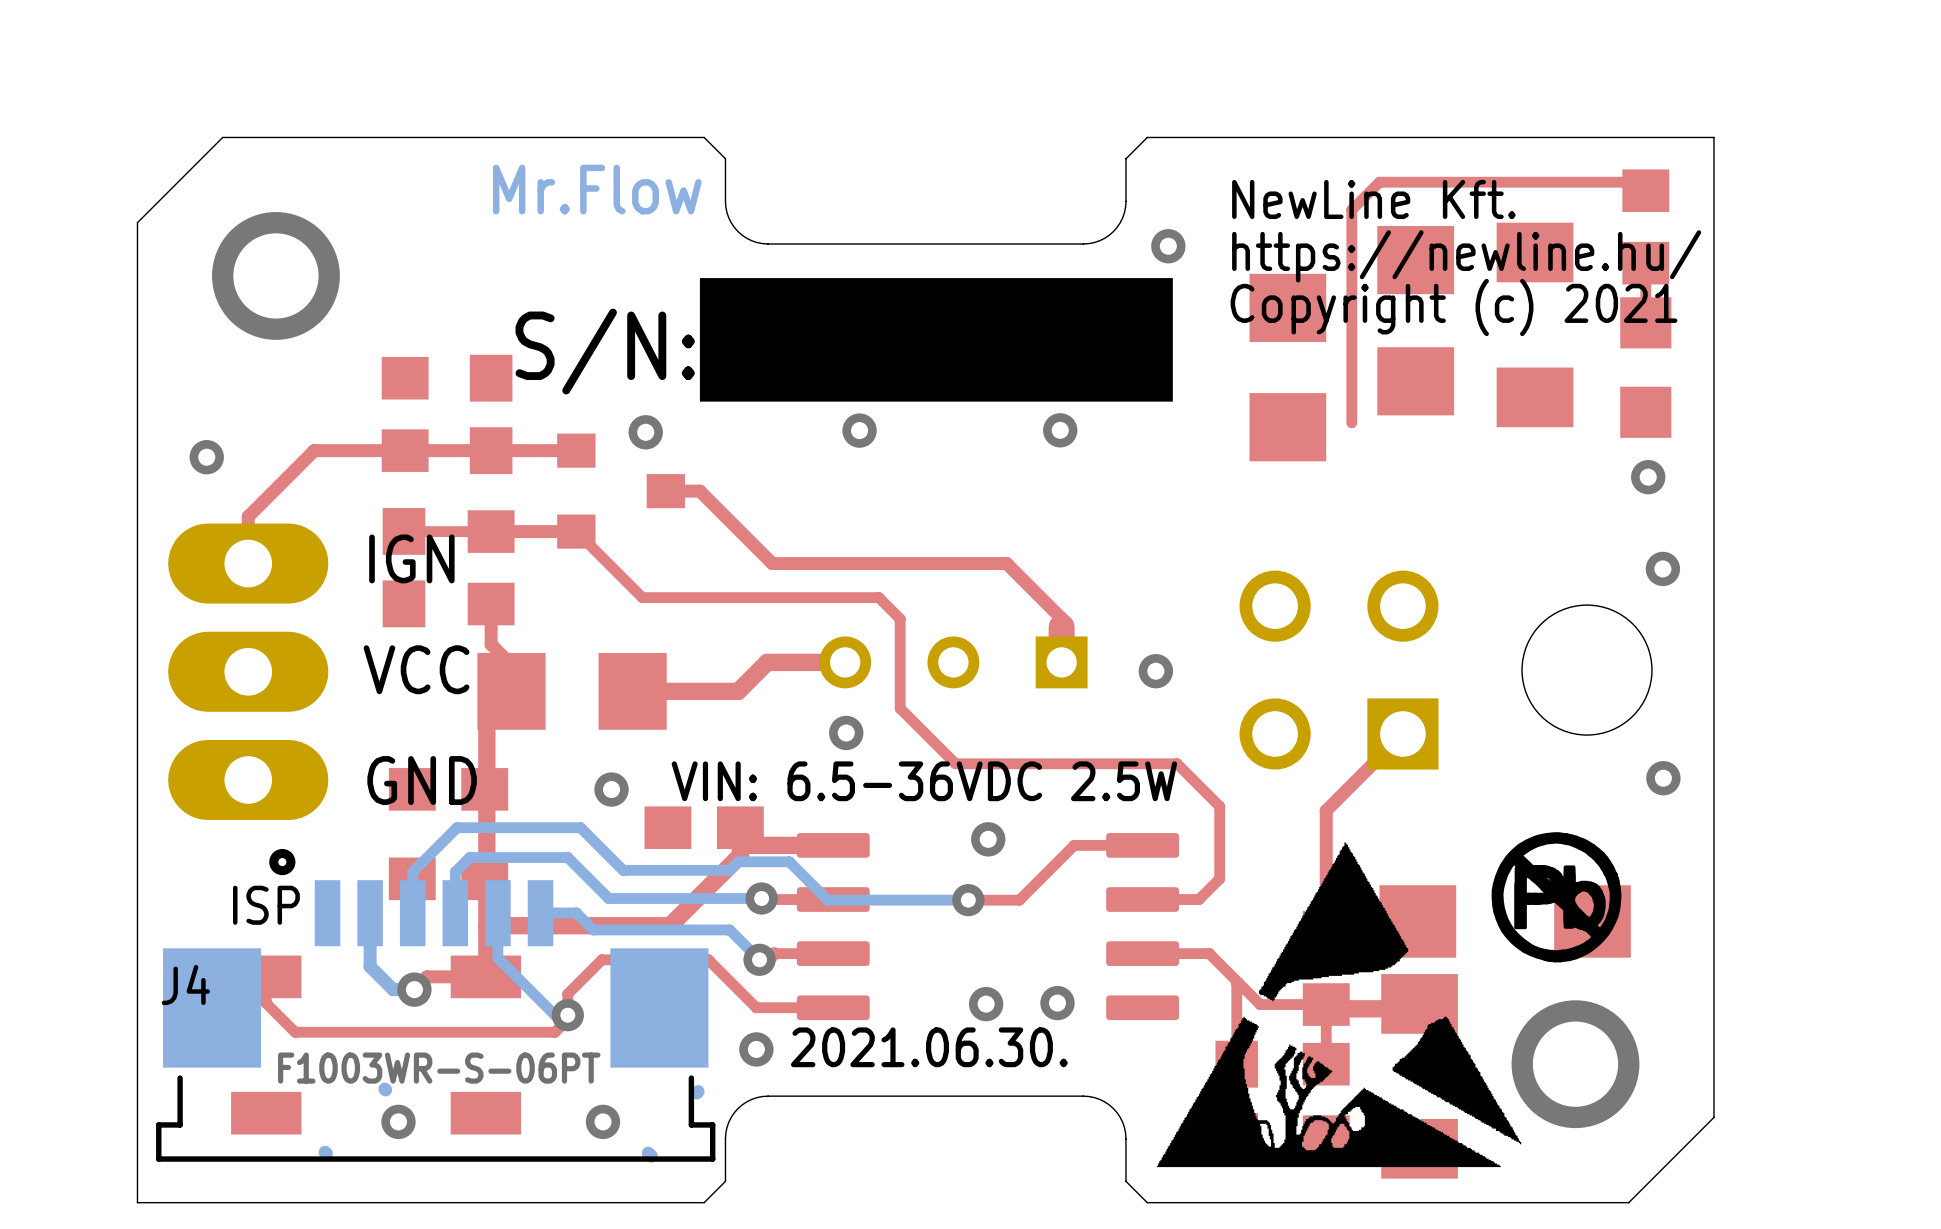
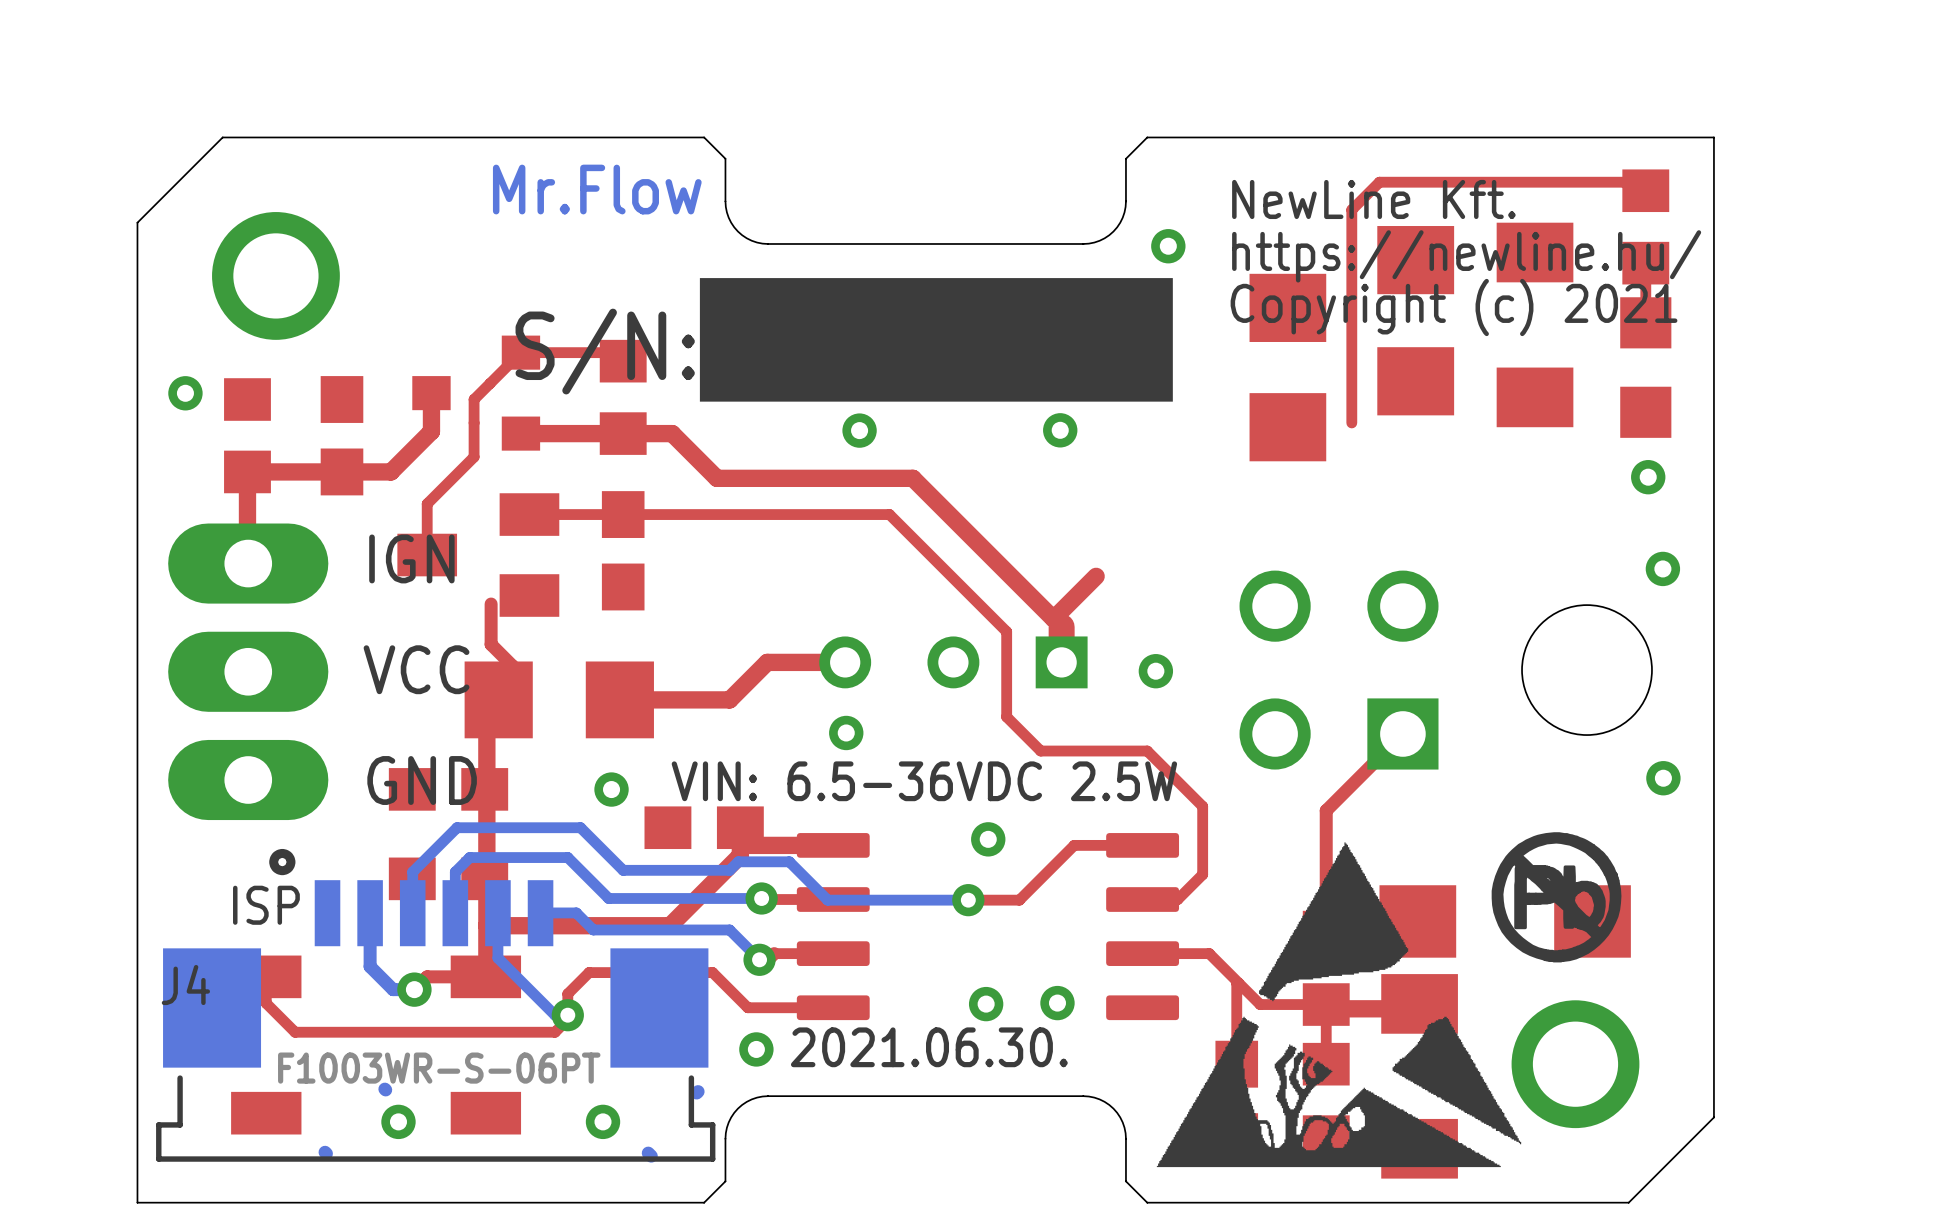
part footprint: [469, 354, 513, 475] -> [412, 335, 541, 451]
top track: none -> (623, 361) (614, 352) (520, 352) (474, 399) (474, 457) (427, 503) (427, 555)
part: none -> (623, 397)
part: (405, 414) -> none
via: (645, 432) -> none
top track: none -> (520, 433) (672, 433) (716, 478) (912, 478) (1053, 618) (1096, 576)
part: none -> (247, 435)
part: none -> (341, 435)
top track: (576, 450) (314, 450) (248, 516) (248, 563) -> (431, 393) (431, 431) (390, 471) (247, 471) (248, 563)
via position: (206, 457) -> (185, 393)
part: (621, 491) -> none
top track: (665, 491) (699, 491) (772, 563) (1006, 563) (1061, 618) -> none
part footprint: [467, 510, 515, 626] -> [397, 493, 560, 617]
top track: (404, 531) (576, 531) (642, 597) (878, 597) (900, 618) (900, 708) (955, 763) (1177, 763) (1219, 806) (1219, 878) (1199, 899) (1177, 899) -> (529, 514) (889, 514) (1006, 631) (1006, 716) (1040, 751) (1147, 751) (1202, 806) (1202, 874) (1177, 899)
part: none -> (623, 550)
part: (403, 567) -> none
part position: (572, 691) -> (559, 699)
top track: (738, 691) (632, 691) -> (738, 691) (729, 699) (619, 699)
top track: (589, 972) (601, 959) (708, 959) (756, 1007) -> (589, 972) (712, 972) (747, 1007) (756, 1007)

